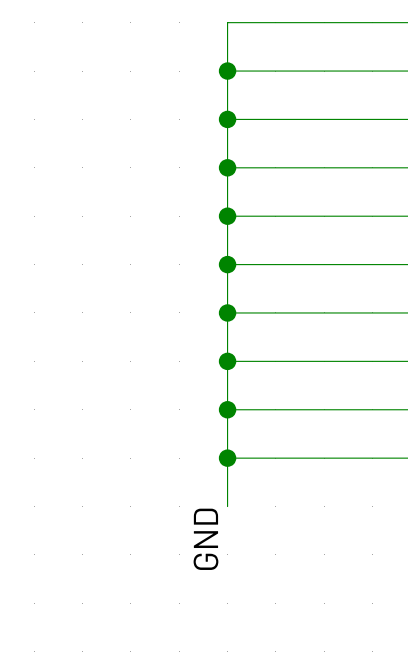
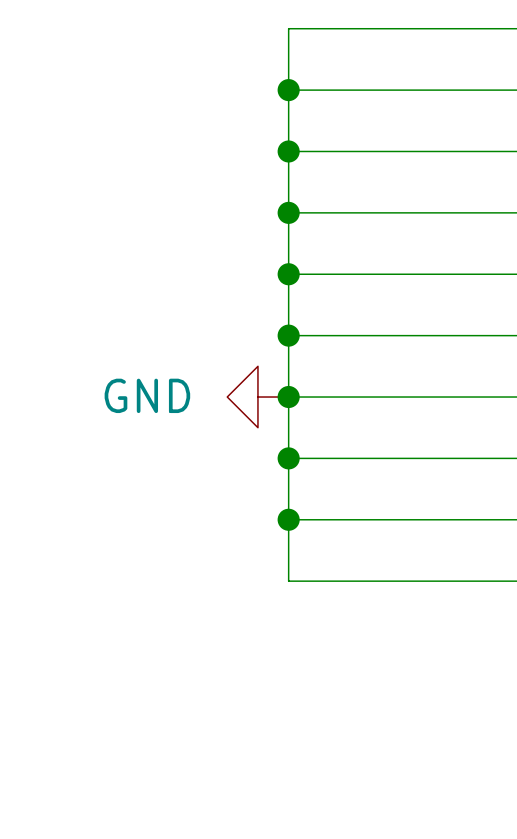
power symbol: none -> GND (257, 397)
wire: (227, 458) (227, 506) -> none
junction: (227, 458) -> none
label: GND (205, 539) -> none

